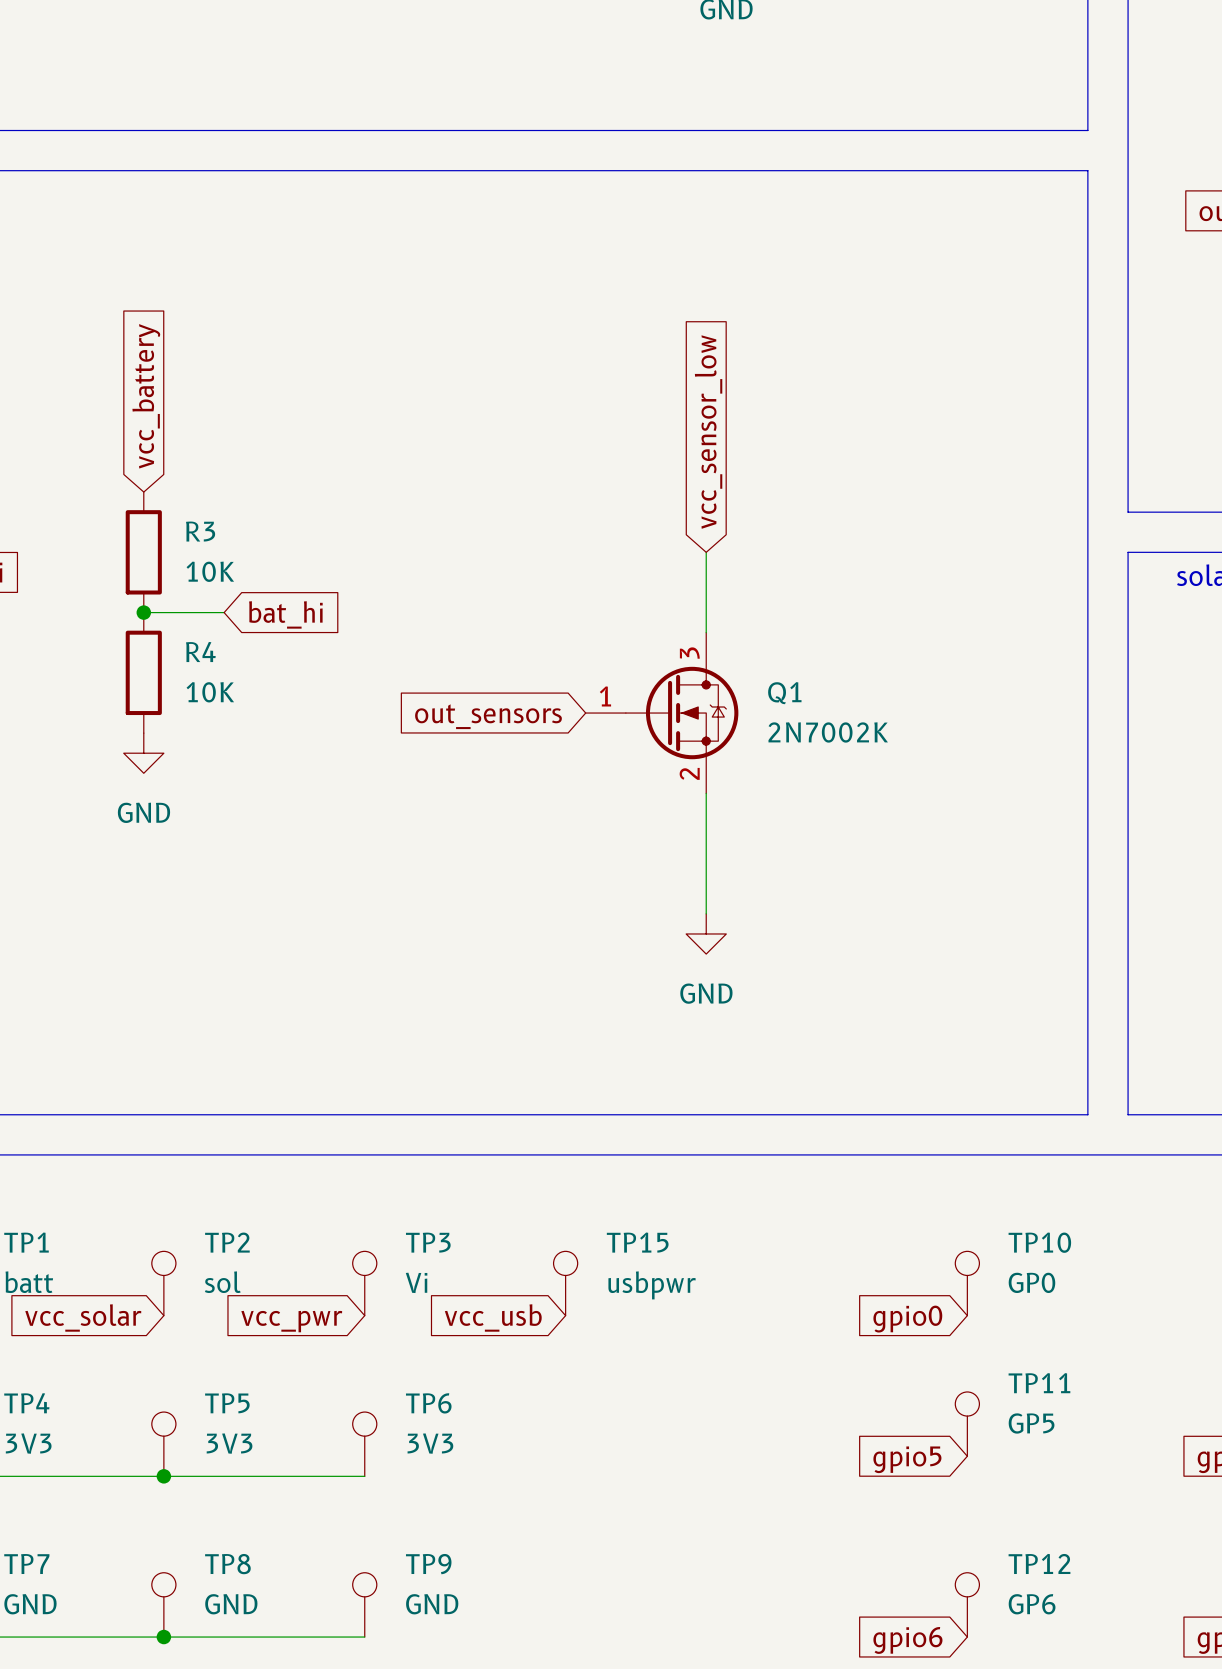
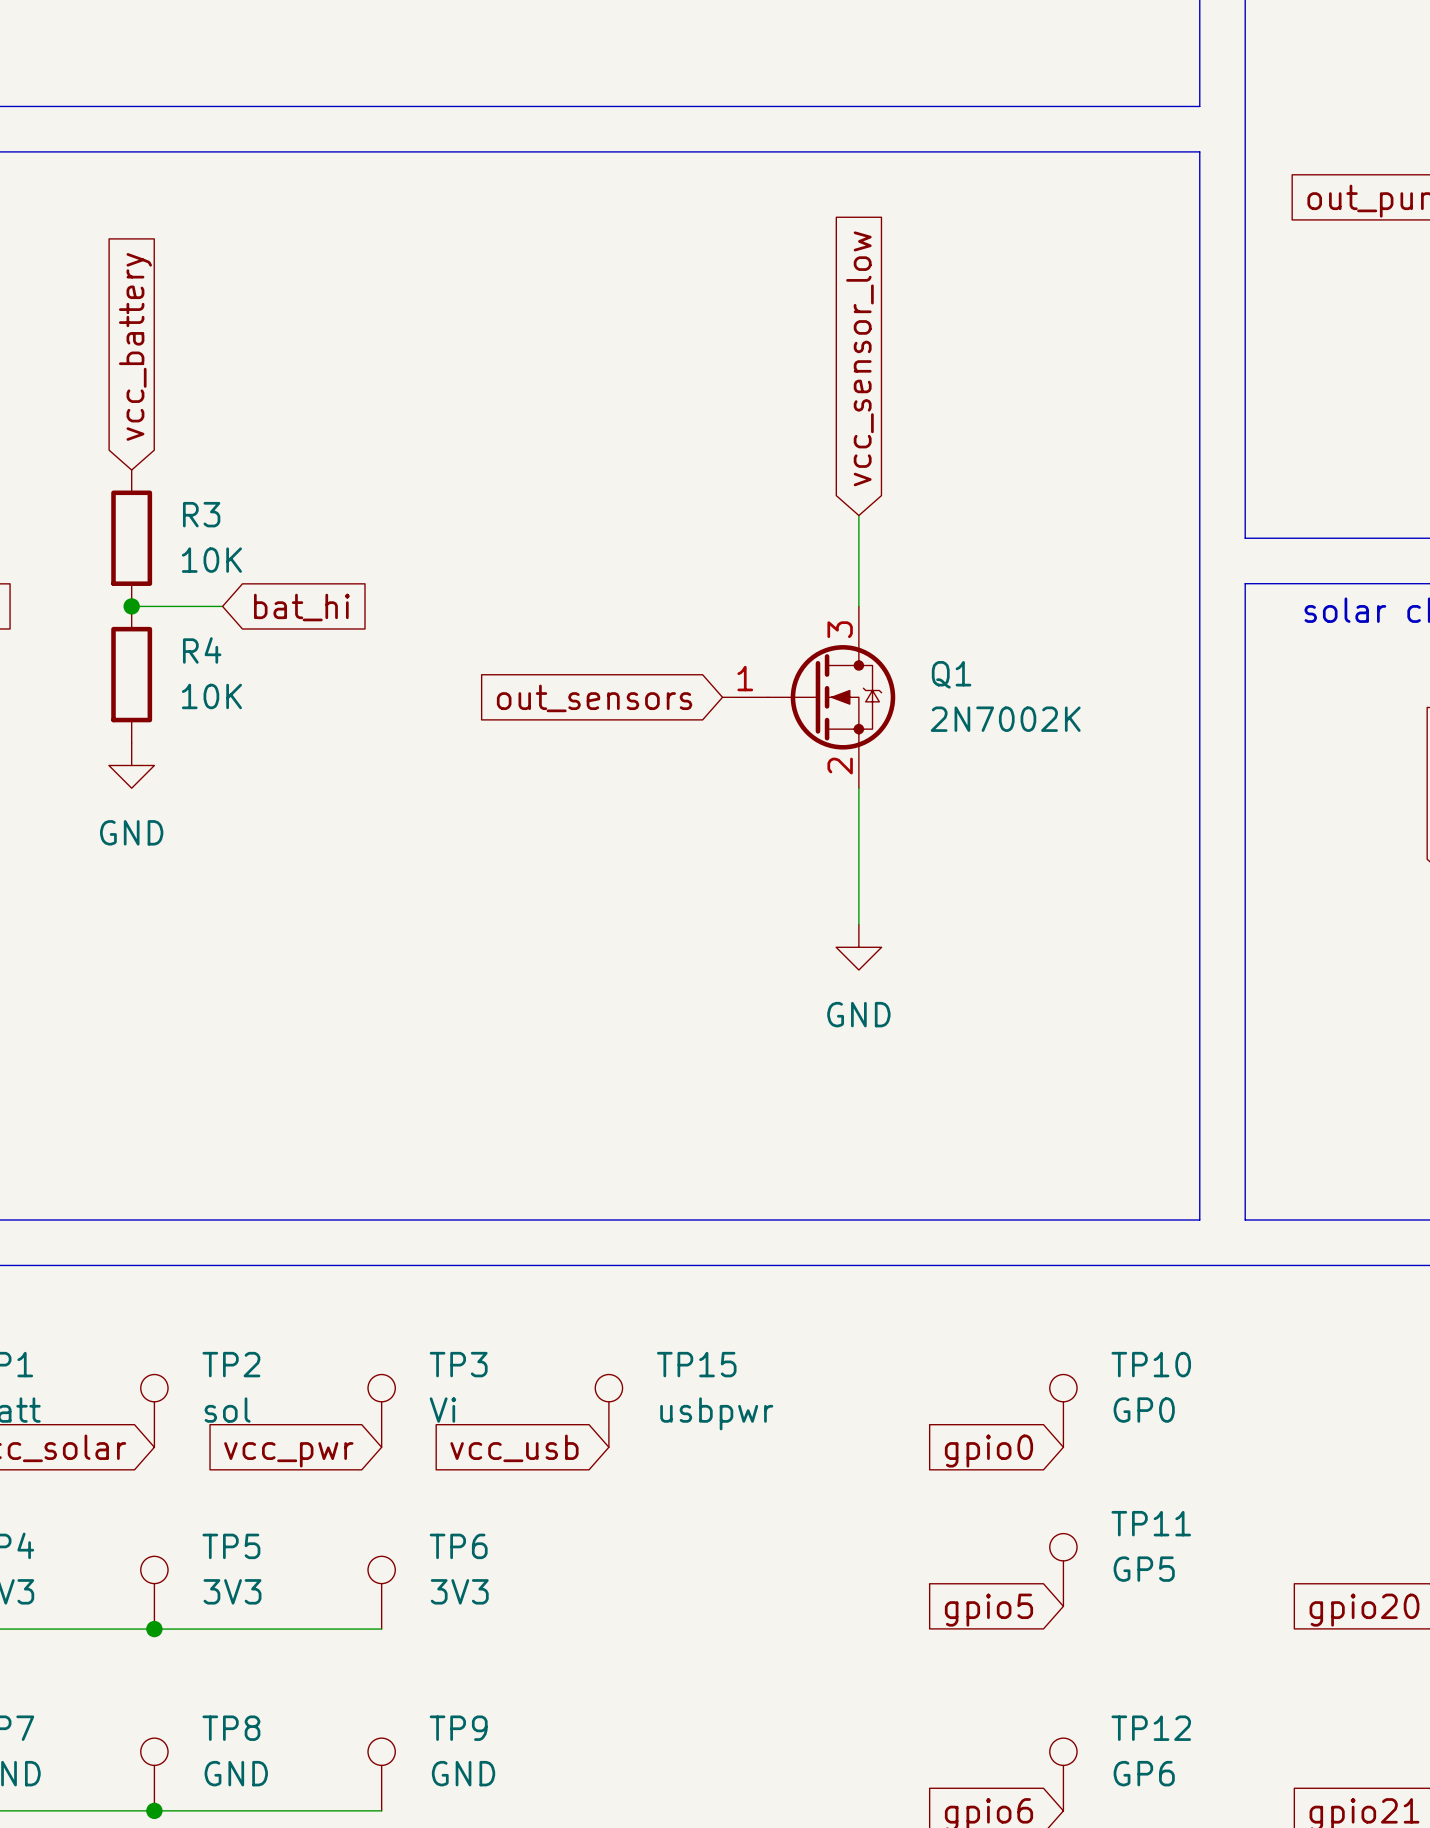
global label position: vcc_battery (146, 396) -> vcc_battery (135, 346)
global label position: vcc_sensor_low (708, 432) -> vcc_sensor_low (859, 358)
R3 position: (143, 552) -> (131, 538)
wire: (706, 552) (706, 632) -> (858, 515) (858, 606)
wire: (143, 612) (224, 612) -> (131, 606) (222, 606)
junction position: (143, 612) -> (131, 606)
global label position: bat_hi (285, 614) -> bat_hi (301, 607)
R4 position: (143, 672) -> (131, 674)
Q1 position: (662, 713) -> (808, 697)
global label position: out_sensors (488, 716) -> out_sensors (594, 698)
power symbol position: GND (143, 753) -> GND (131, 765)
wire: (706, 793) (706, 913) -> (858, 788) (858, 924)
power symbol position: GND (706, 933) -> GND (858, 947)

